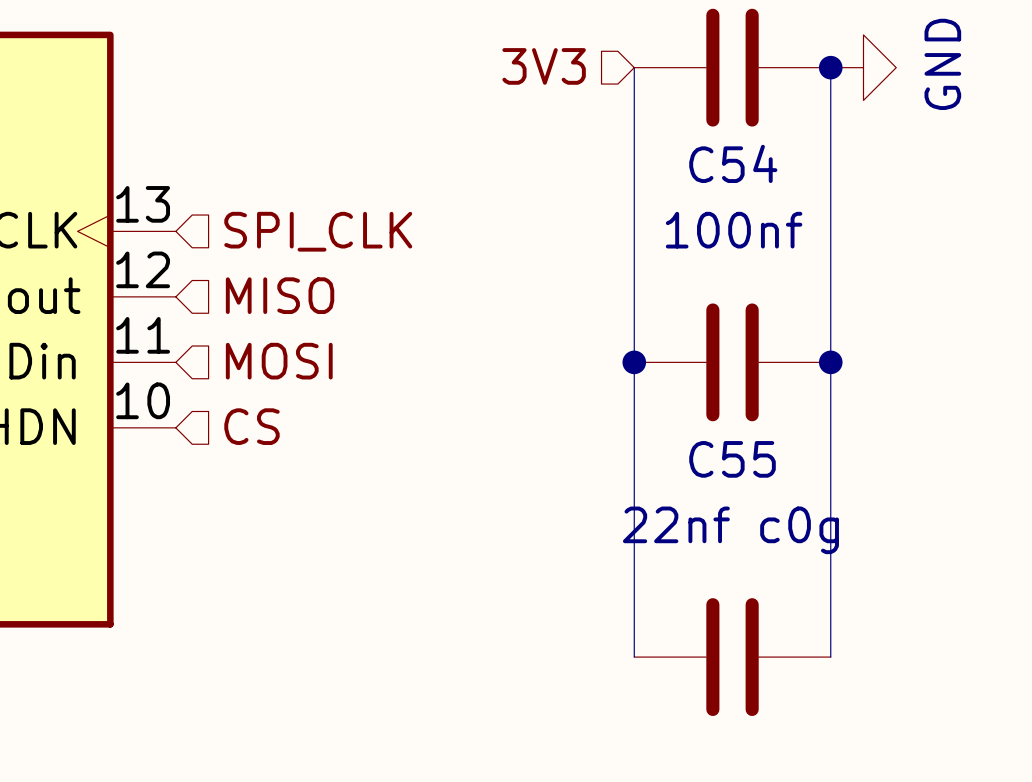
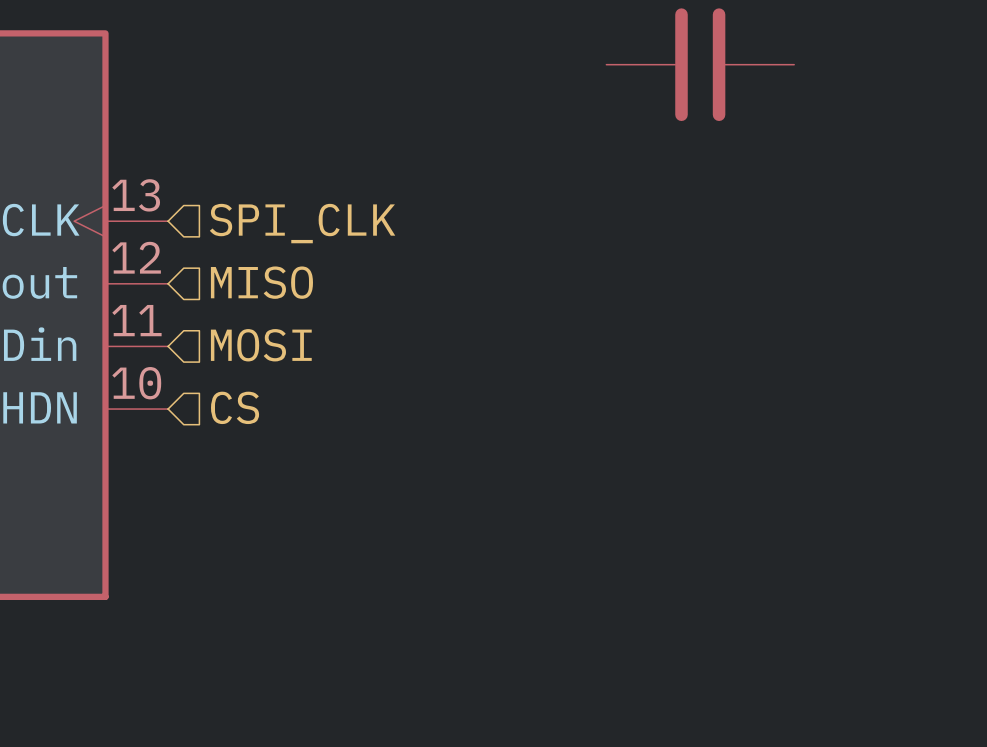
hierarchical label: 3V3 (544, 66) -> none
wire: (634, 67) (634, 657) -> none
wire: (830, 67) (830, 657) -> none
junction: (830, 67) -> none
power symbol: GND (863, 67) -> none
junction: (634, 362) -> none
C54: 100nf (732, 362) -> none
junction: (830, 362) -> none
C55: 22nf c0g (732, 657) -> none

